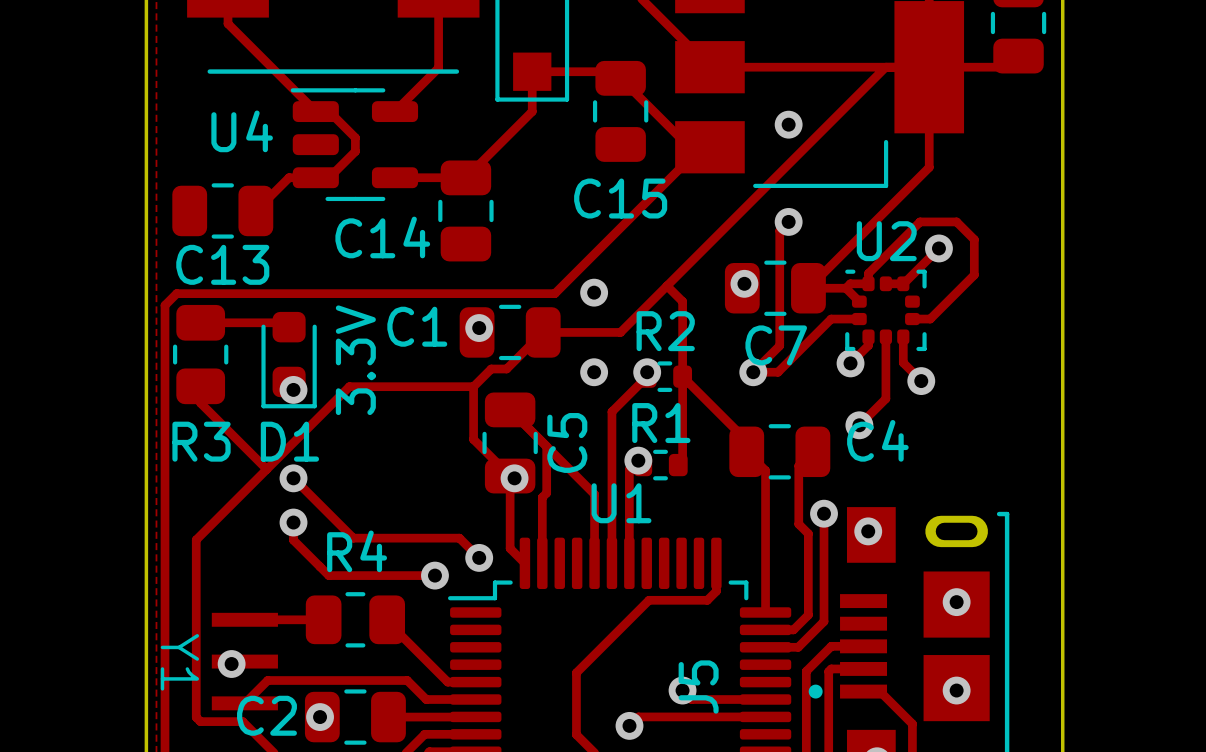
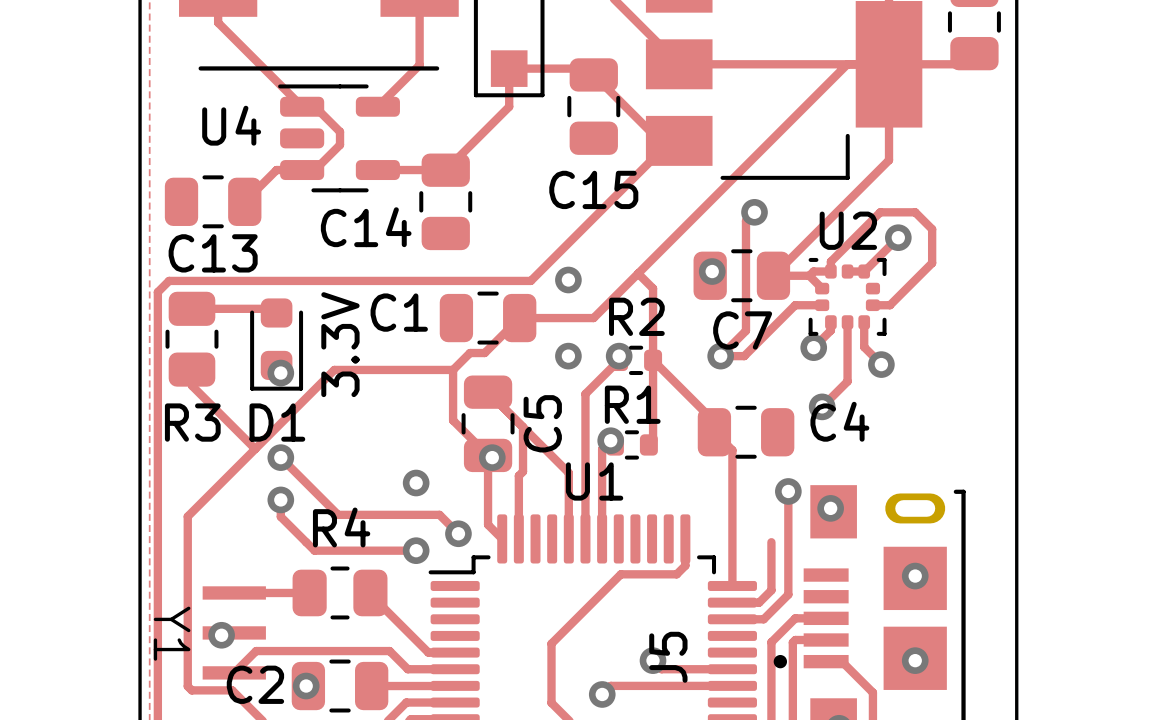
via: (788, 124) -> none
via position: (479, 328) -> (416, 483)
track: (812, 451) (798, 465) (798, 524) (808, 533) (808, 615) (806, 617) -> (771, 542) (771, 590)

